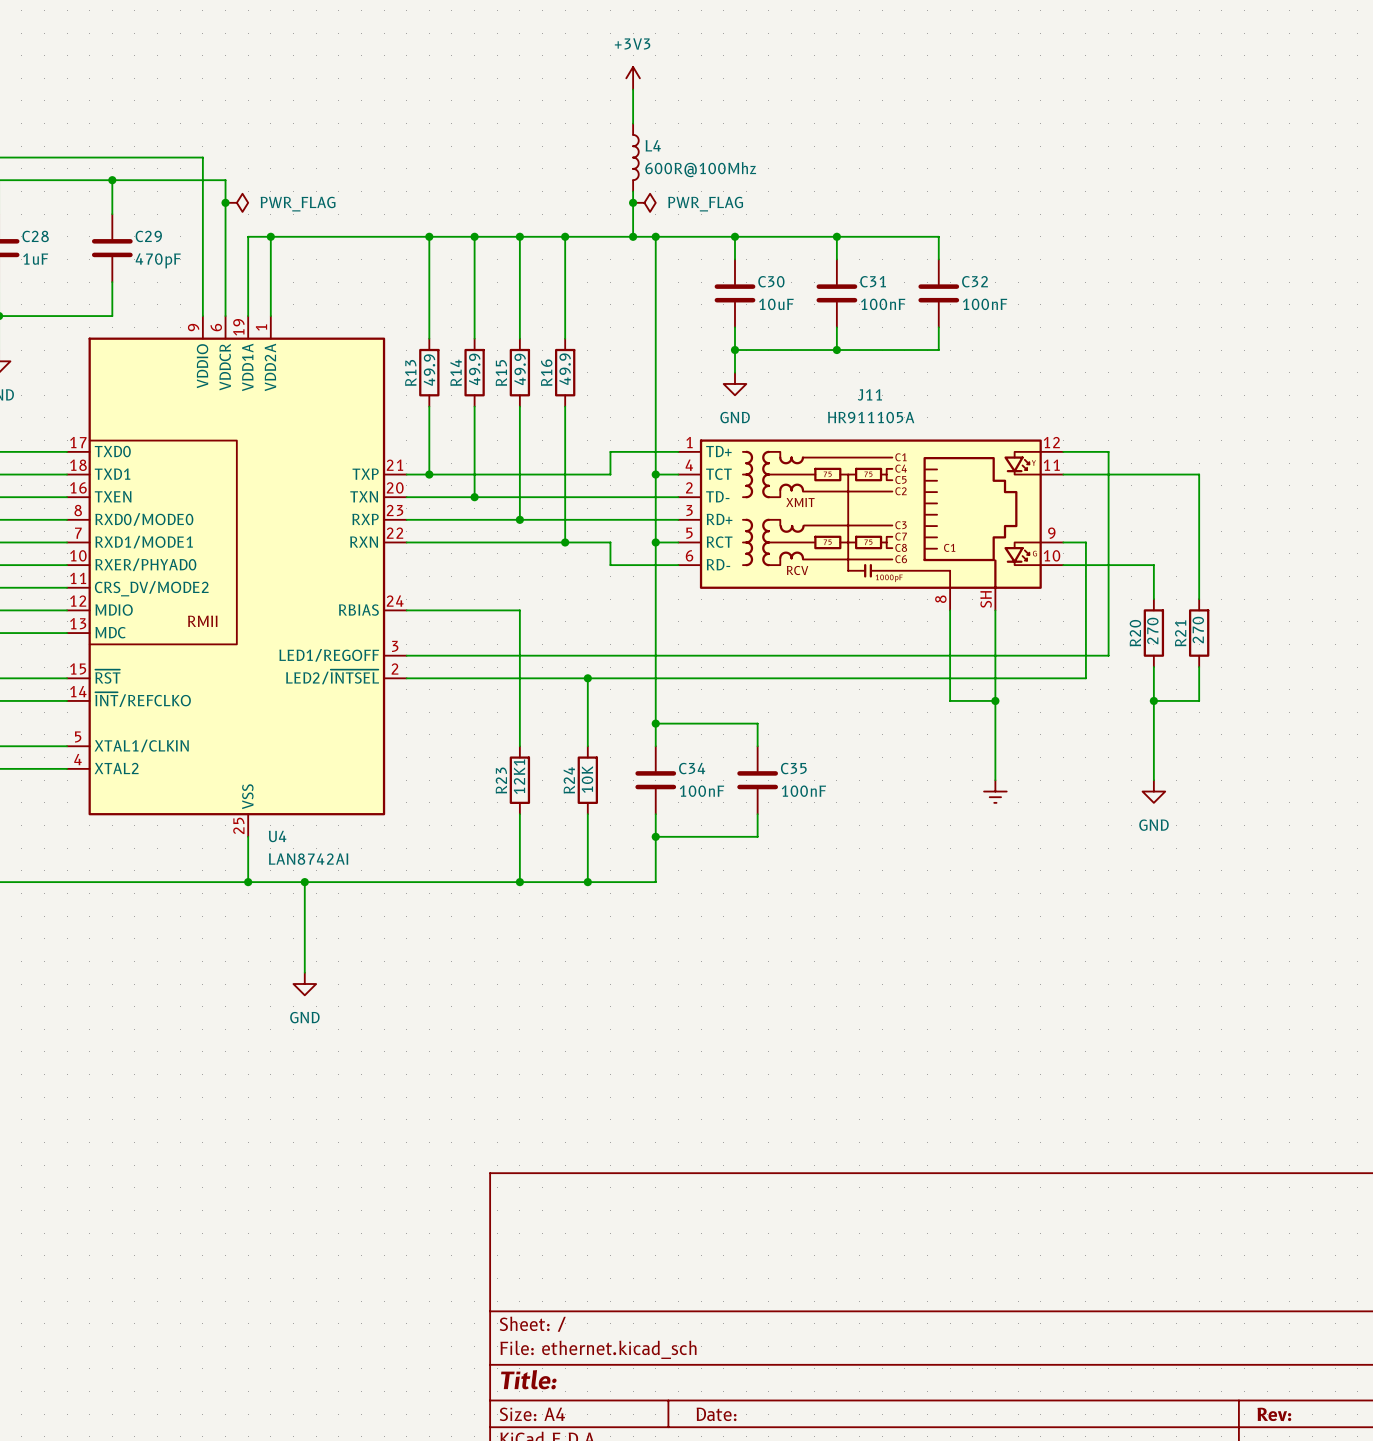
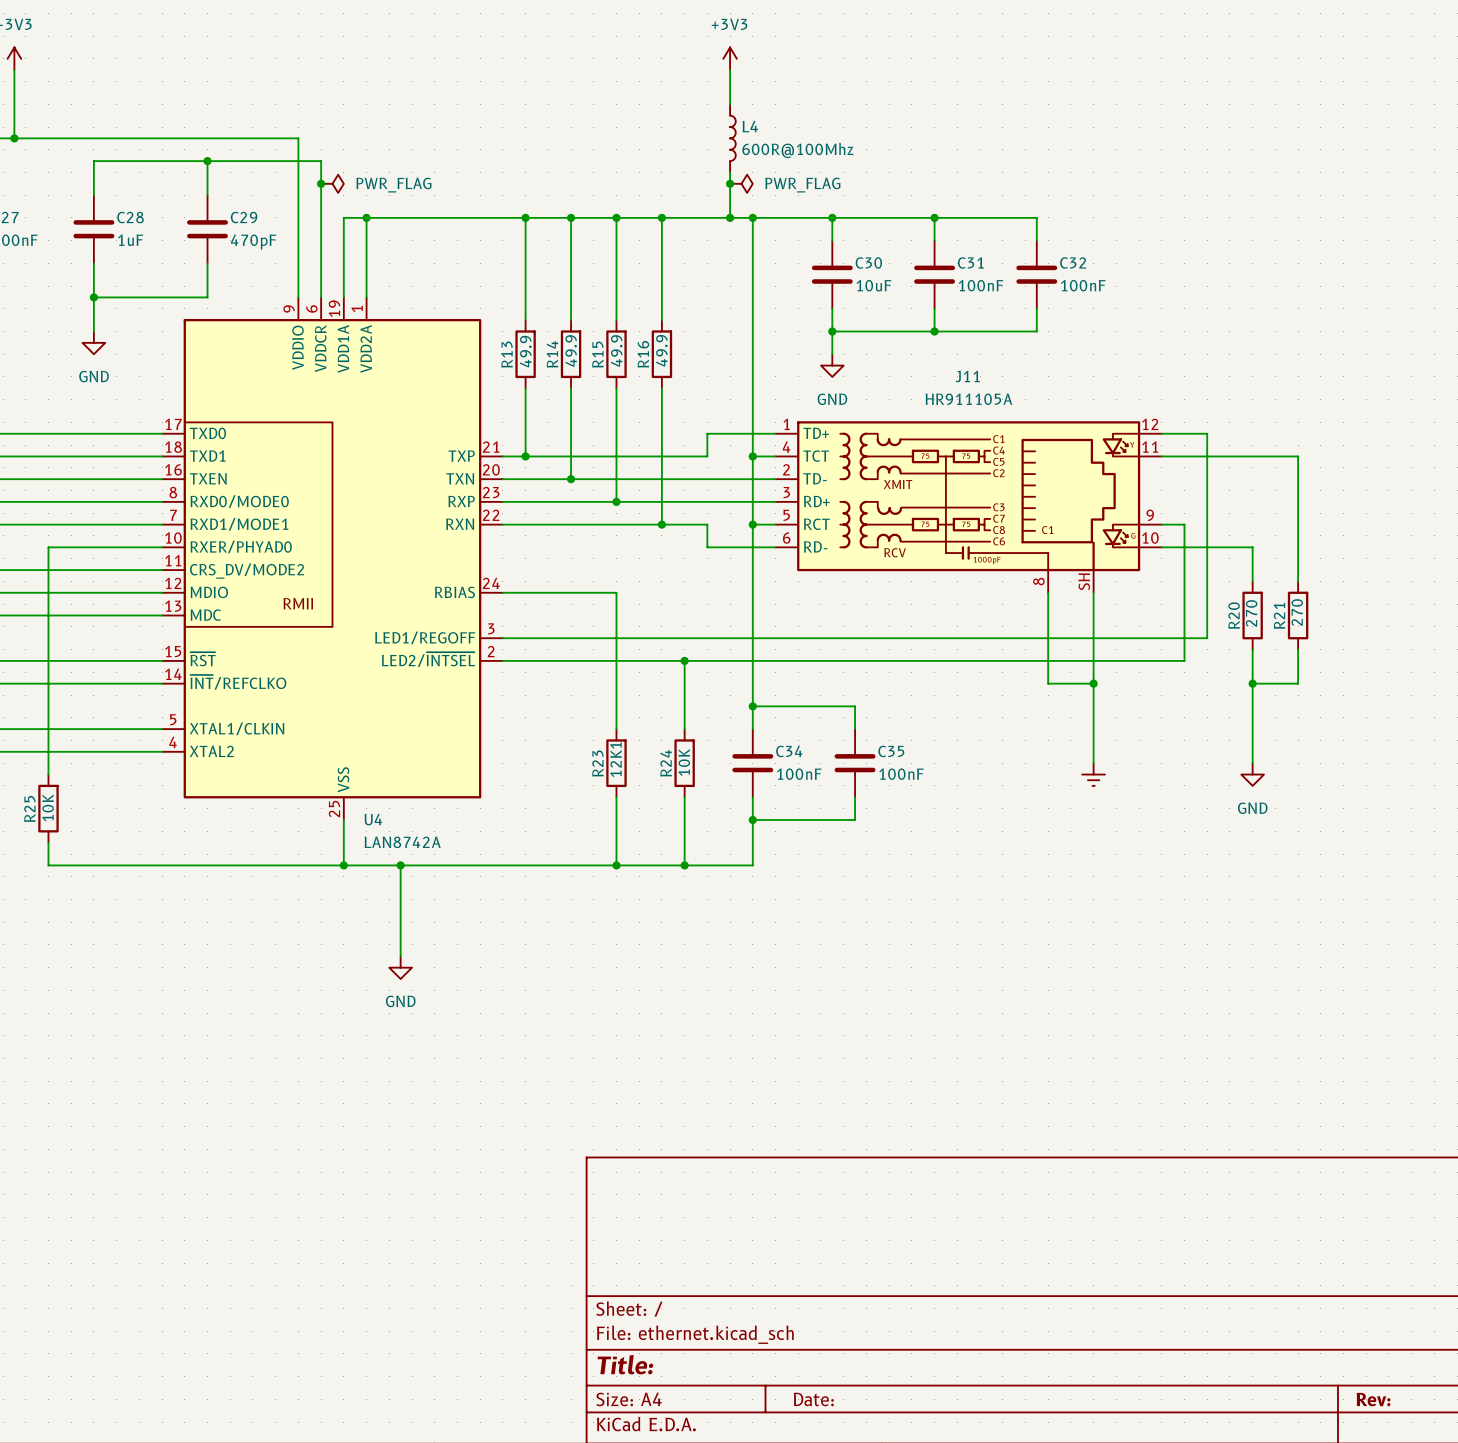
U4 value: LAN8742AI (308, 859) -> LAN8742A (402, 842)

